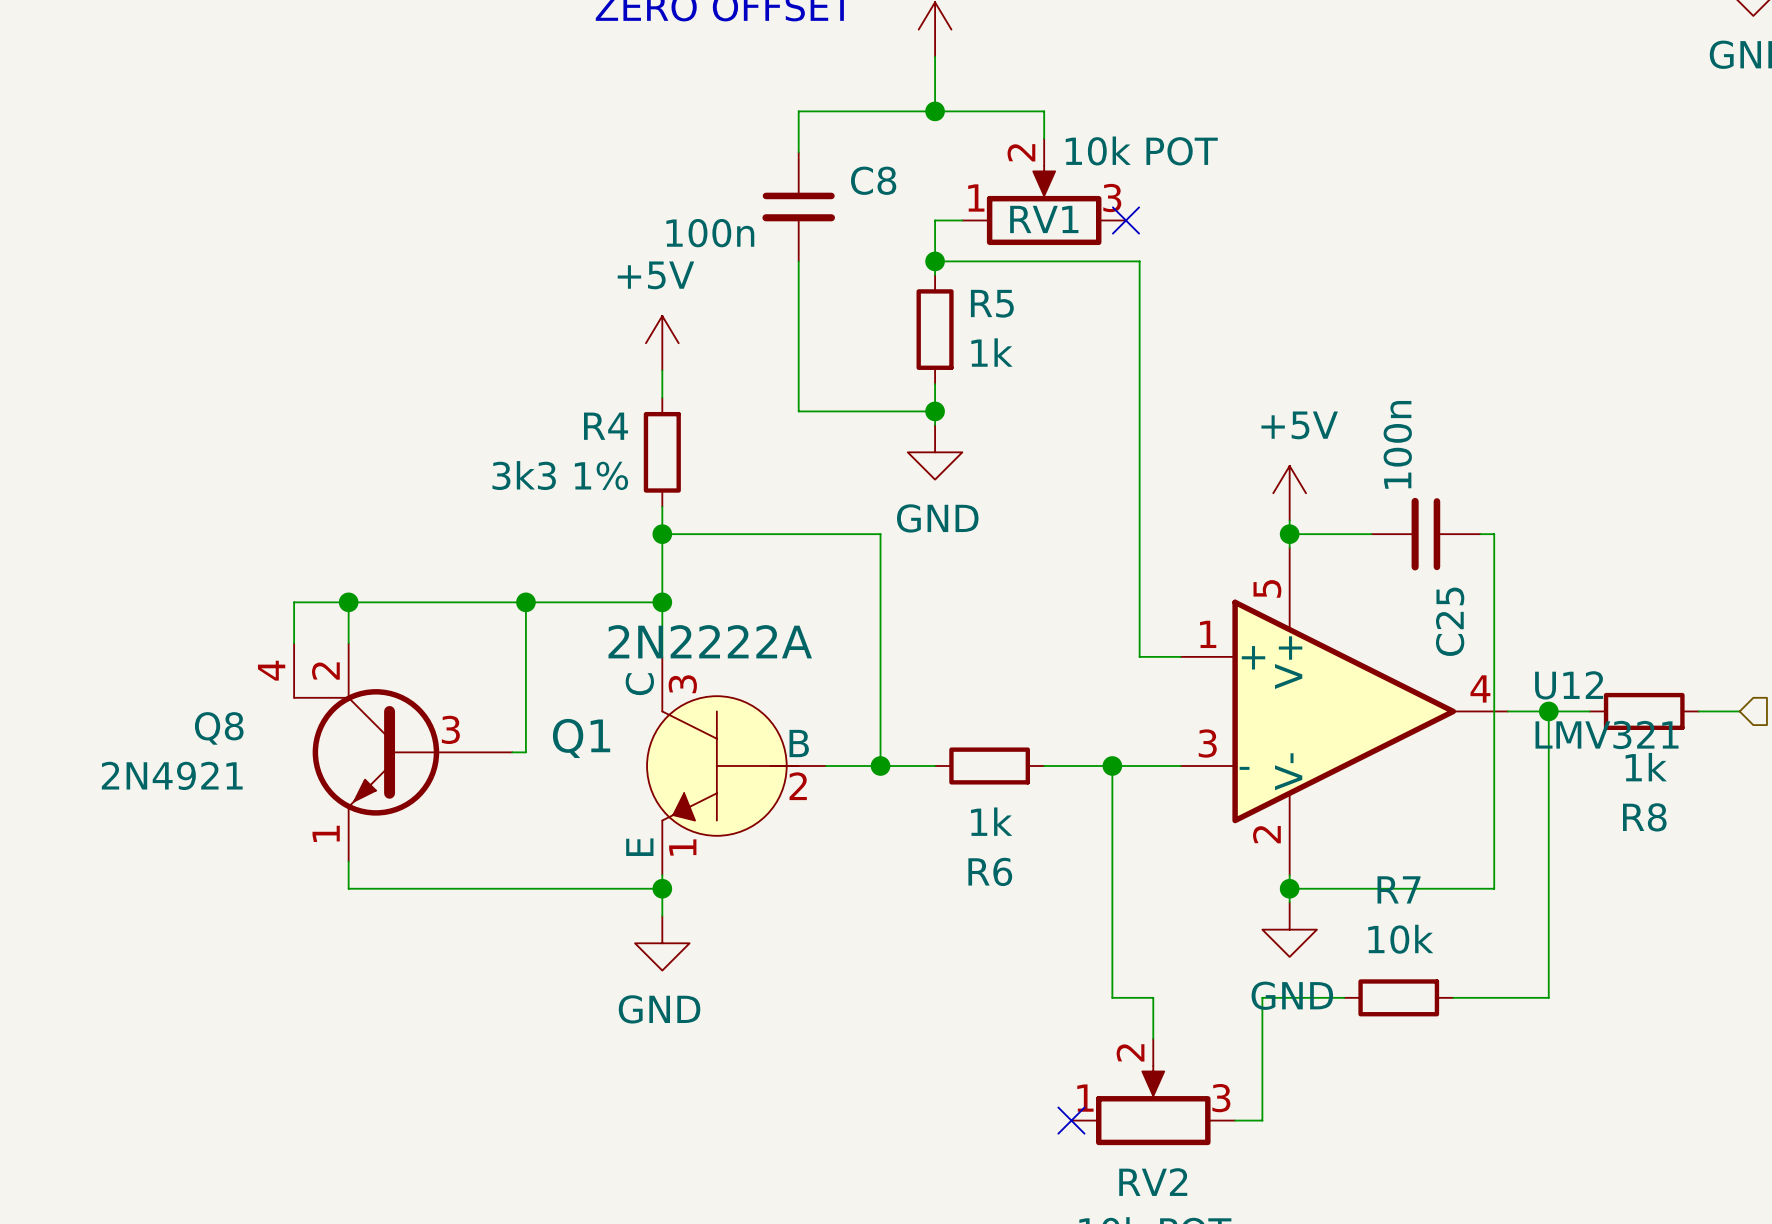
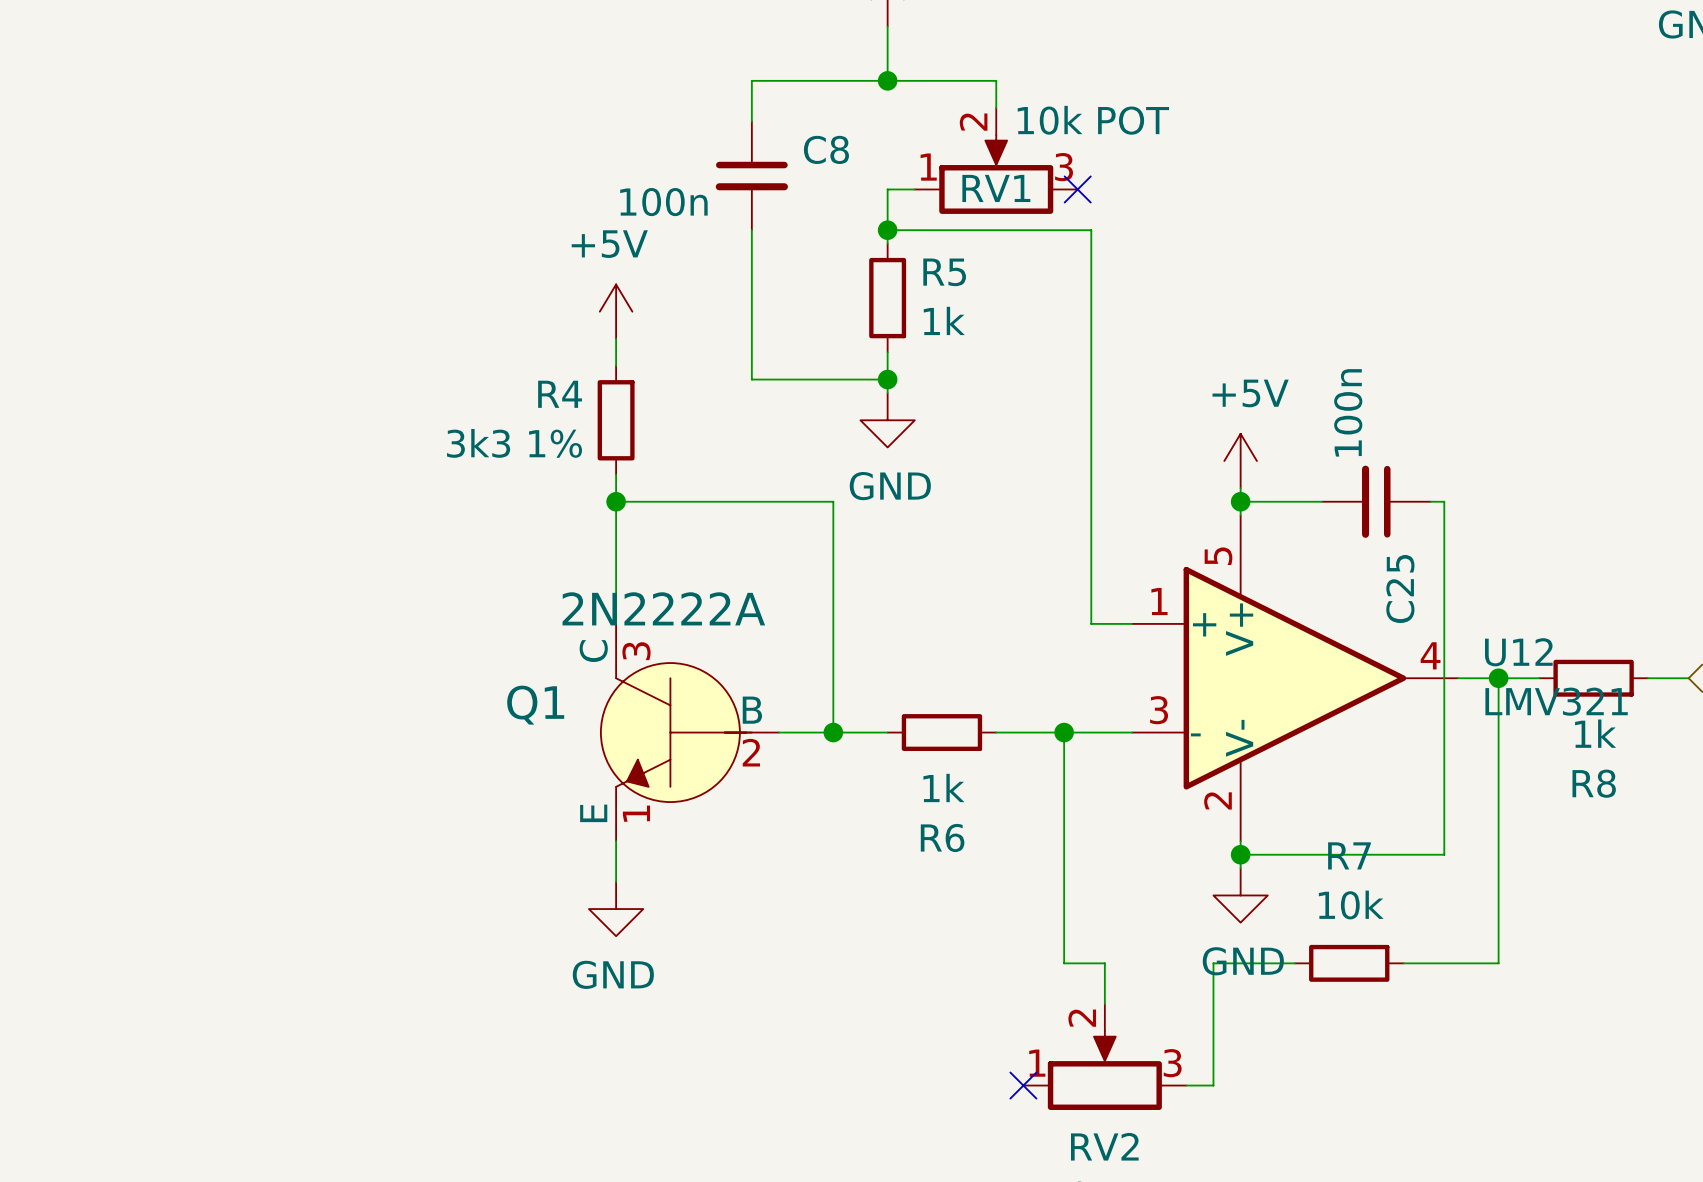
wire: (348, 602) (348, 643) -> none
junction: (348, 602) -> none
wire: (525, 602) (525, 752) (512, 752) -> none
junction: (525, 602) -> none
wire: (662, 602) (294, 602) (294, 643) -> none
junction: (662, 602) -> none
Q8: 2N4921 (403, 752) -> none
wire: (348, 861) (348, 888) (662, 888) -> none
junction: (662, 888) -> none

